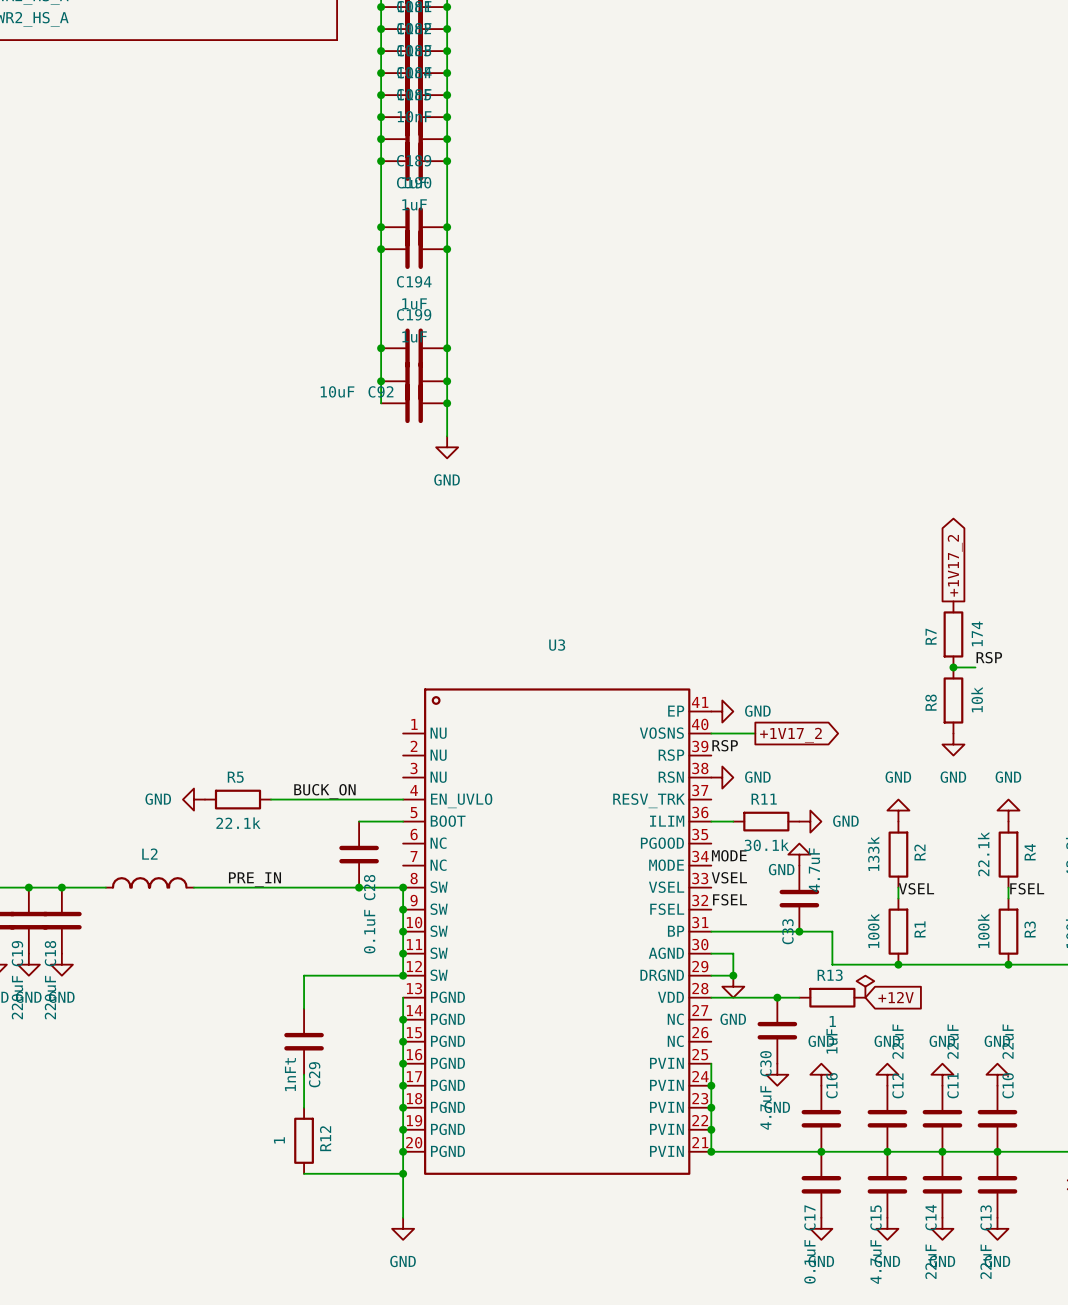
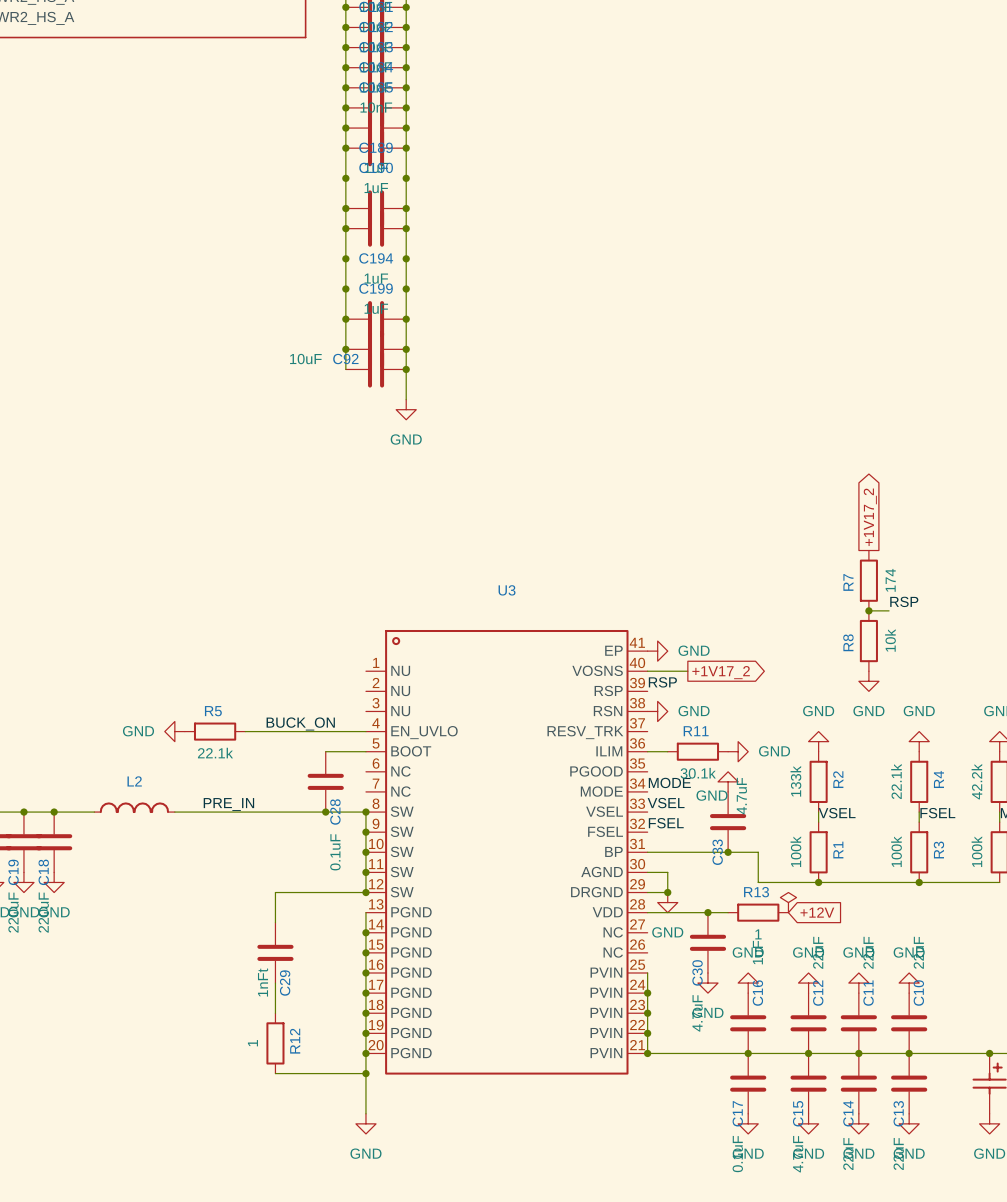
junction: none -> (345, 178)
junction: none -> (406, 178)
junction: none -> (345, 258)
junction: none -> (406, 258)
junction: none -> (345, 288)
junction: none -> (406, 288)

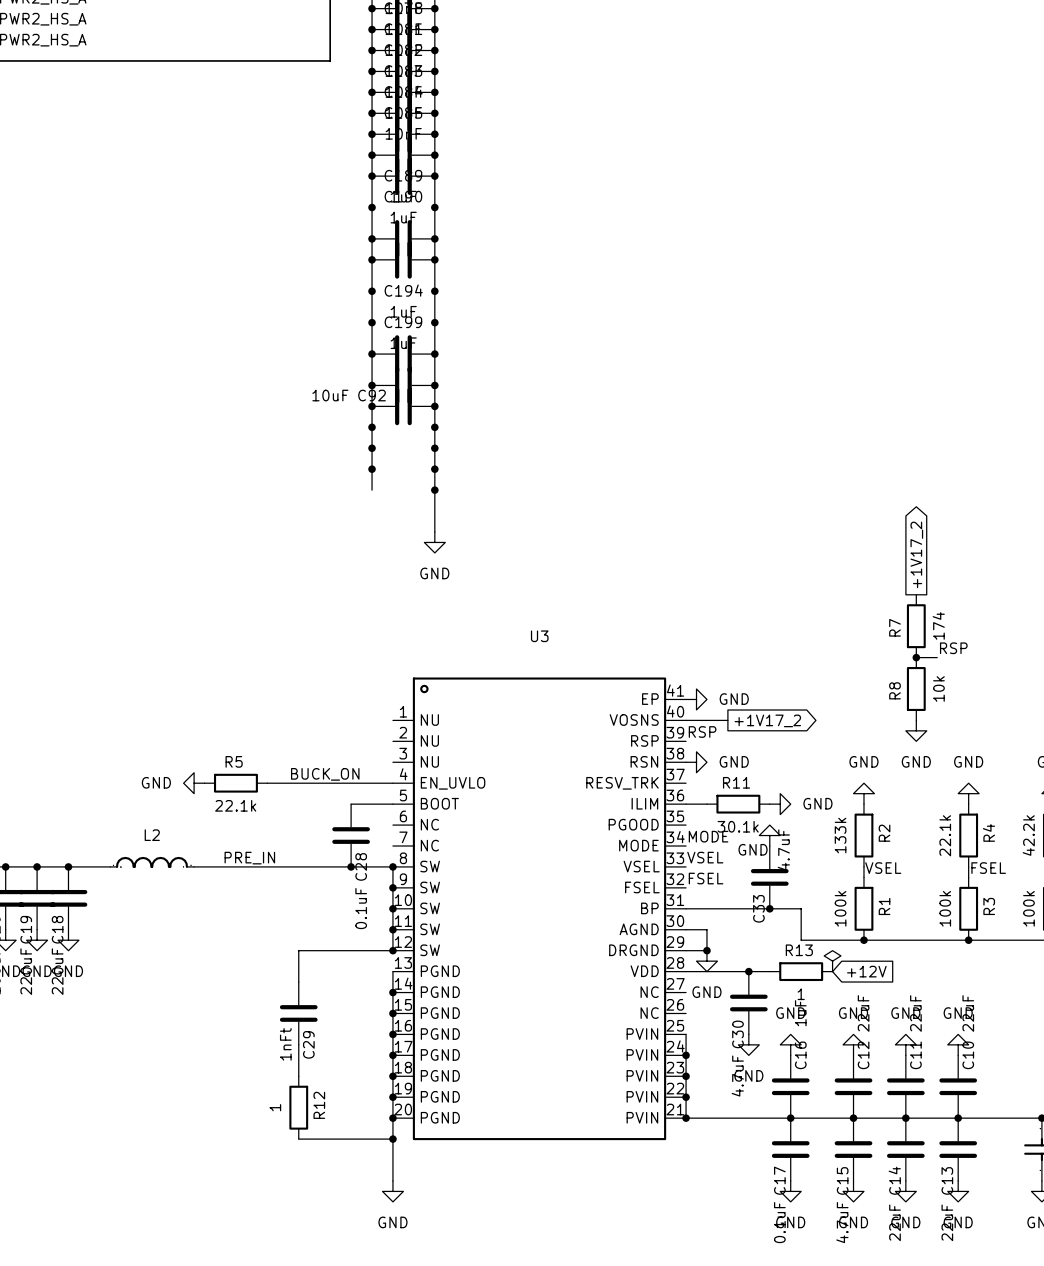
wire: none -> (372, 406) (372, 490)
junction: none -> (372, 406)
junction: none -> (372, 427)
junction: none -> (434, 427)
wire: none -> (434, 437) (434, 531)
junction: none -> (372, 448)
power symbol position: GND (406, 409) -> GND (434, 542)
junction: none -> (434, 448)
junction: none -> (372, 469)
junction: none -> (434, 469)
junction: none -> (434, 490)

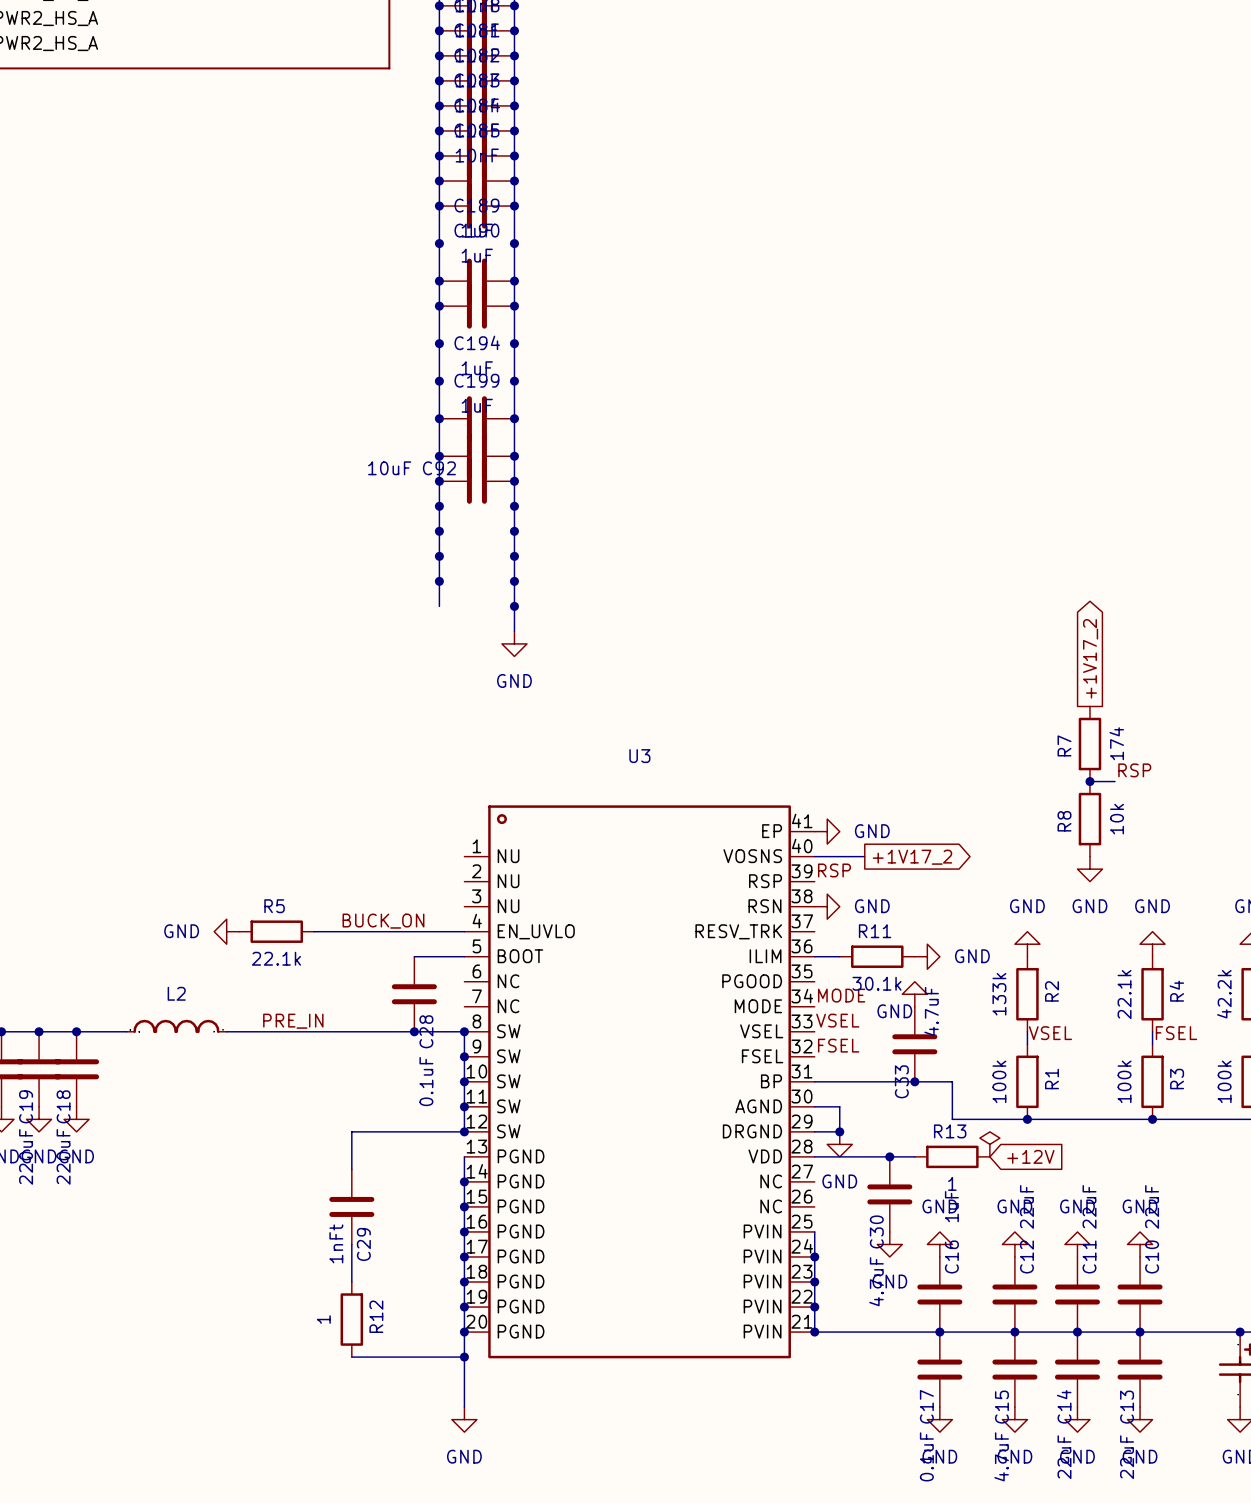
wire: none -> (439, 581) (439, 606)
junction: none -> (439, 581)
junction: none -> (514, 606)

